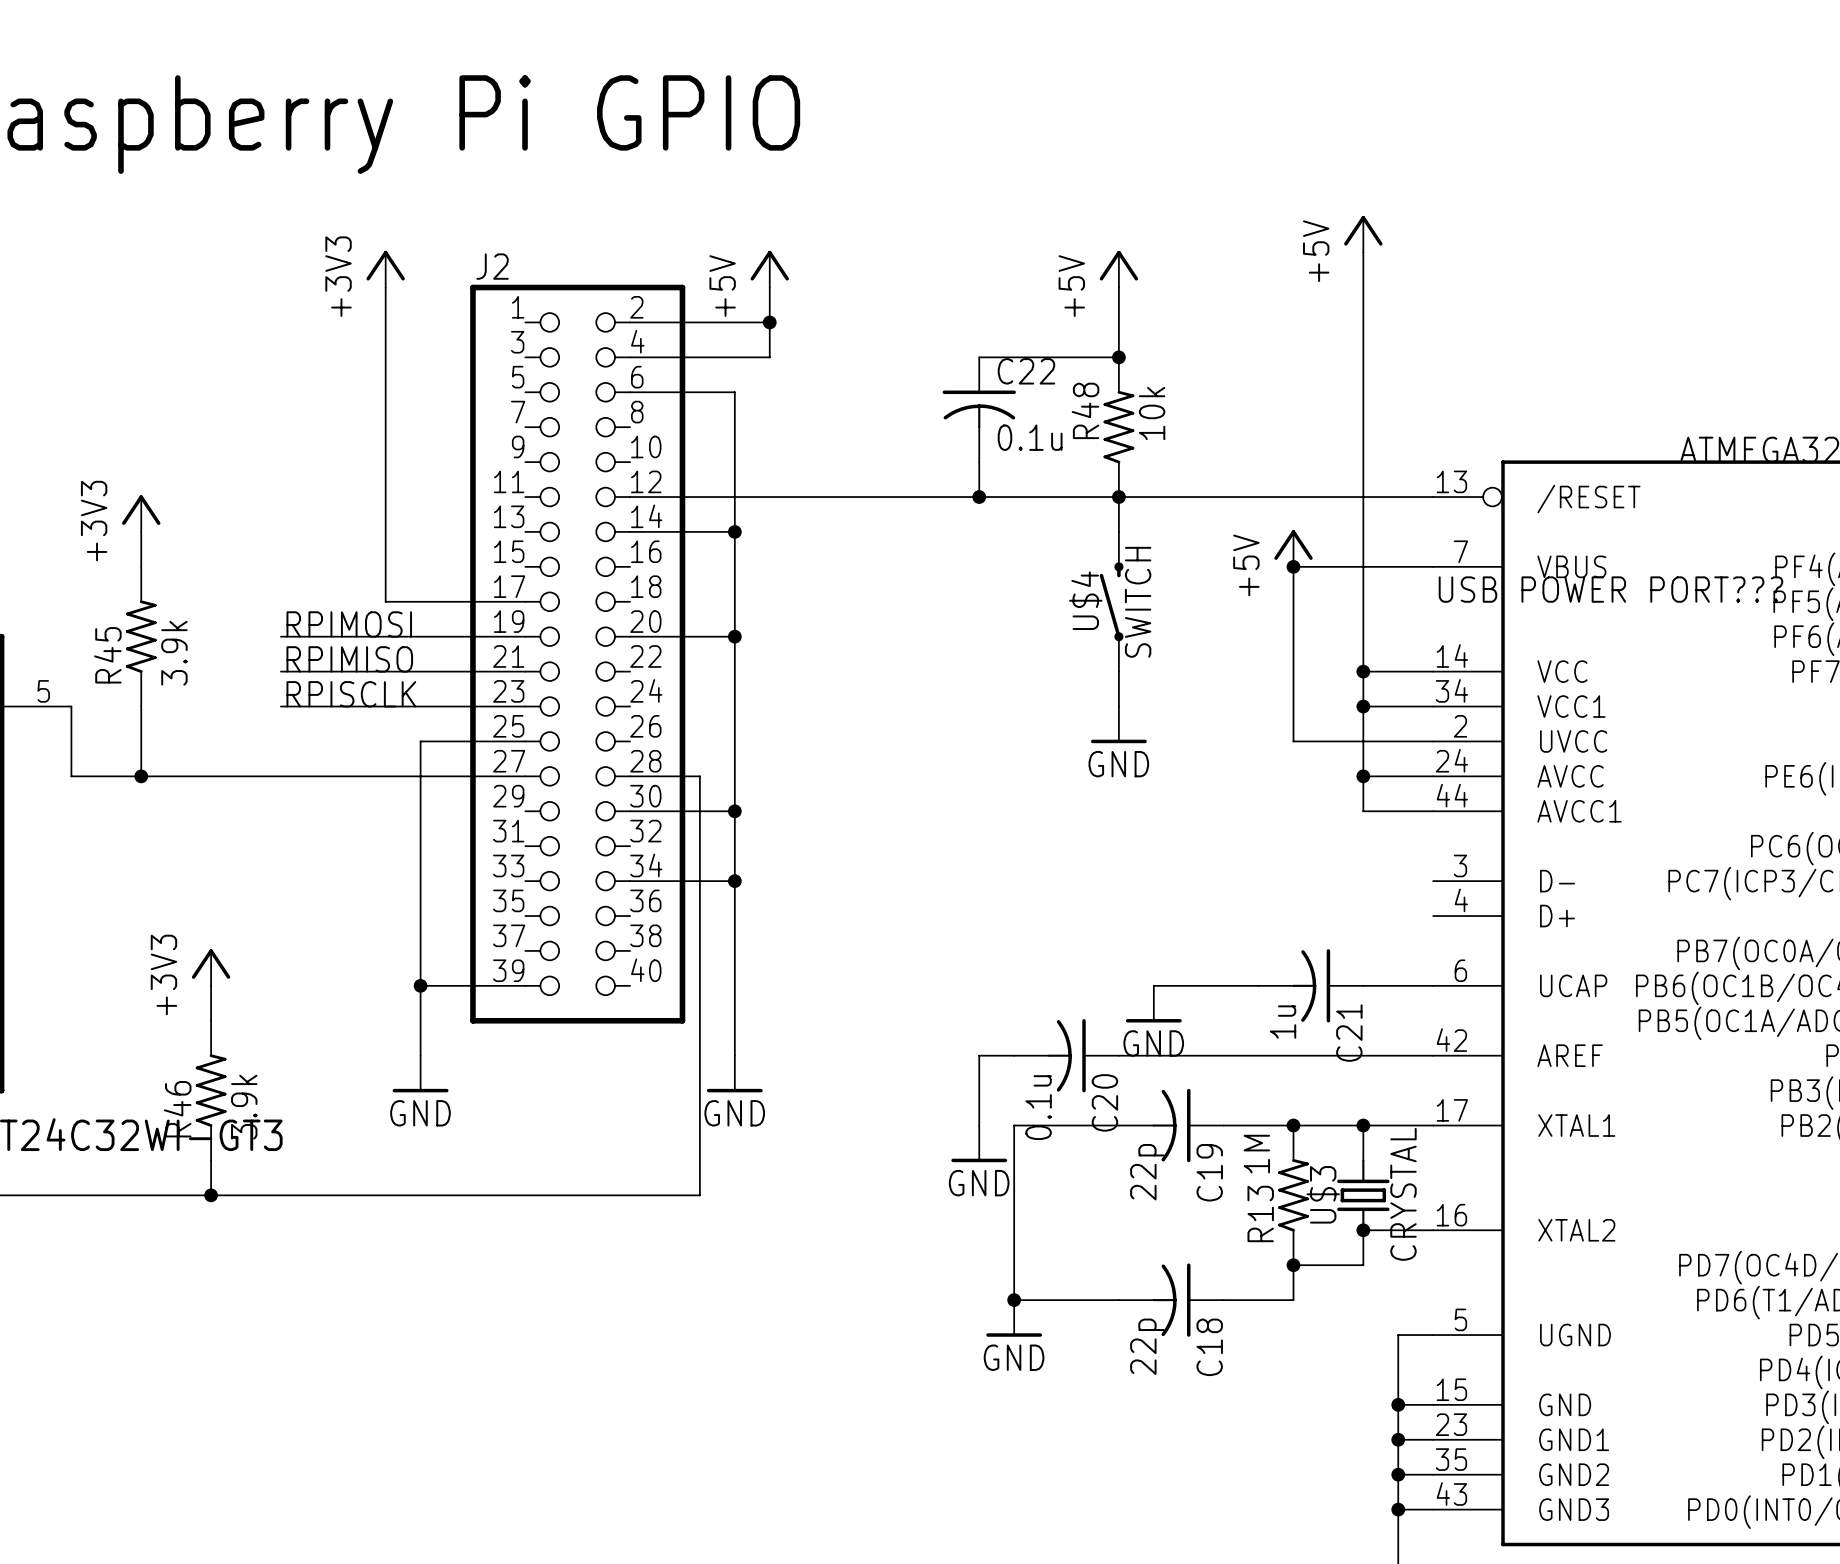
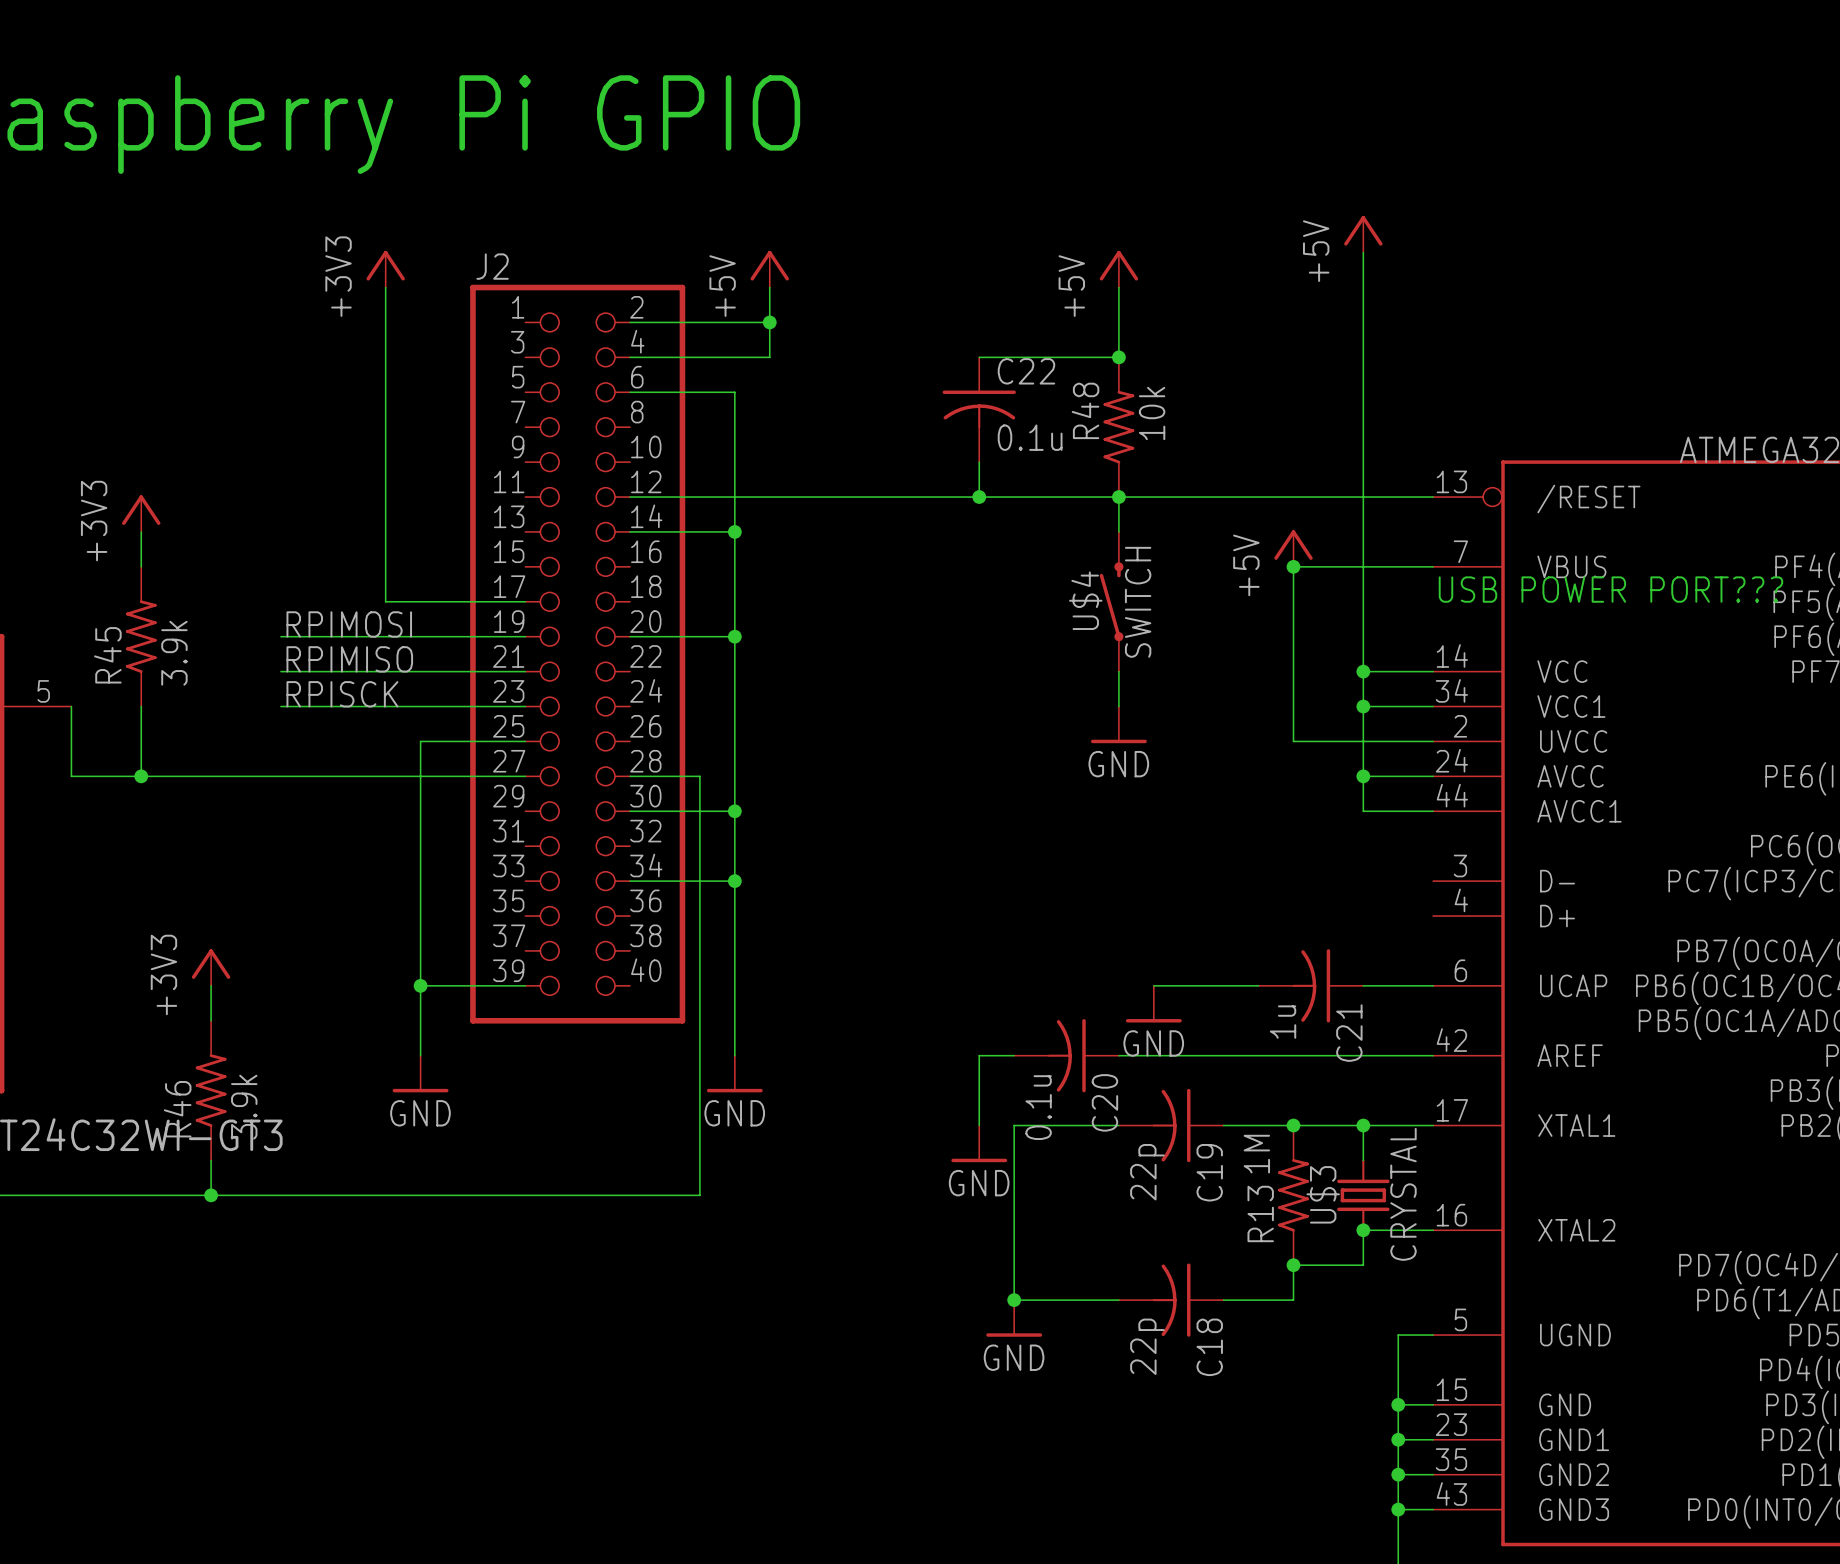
label: RPISCLK (351, 694) -> RPISCK (342, 694)

